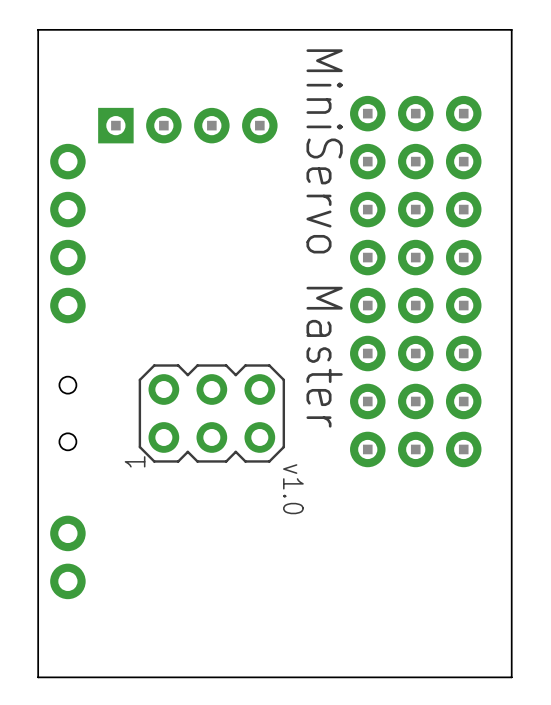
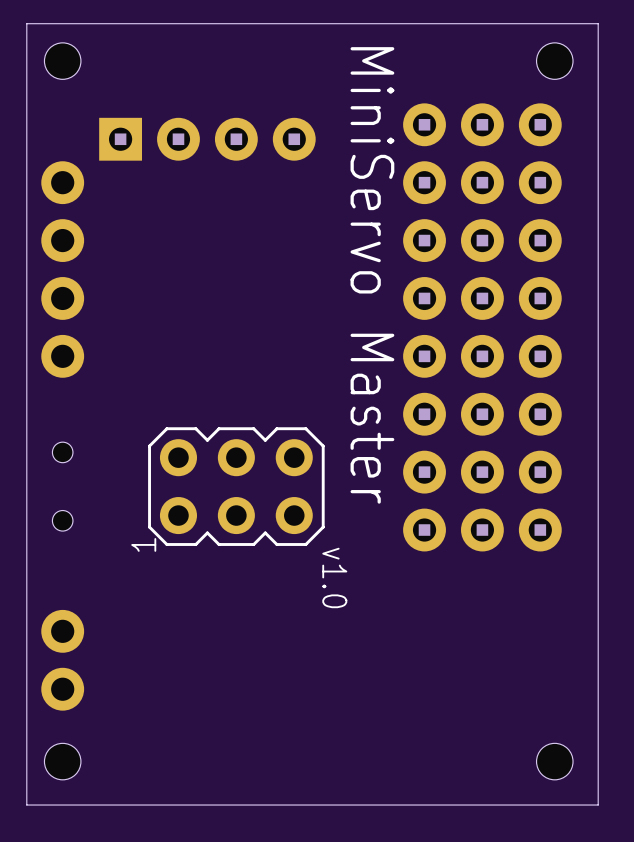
hole: none -> (62, 61)
hole: none -> (554, 61)
hole: none -> (62, 761)
hole: none -> (554, 761)

